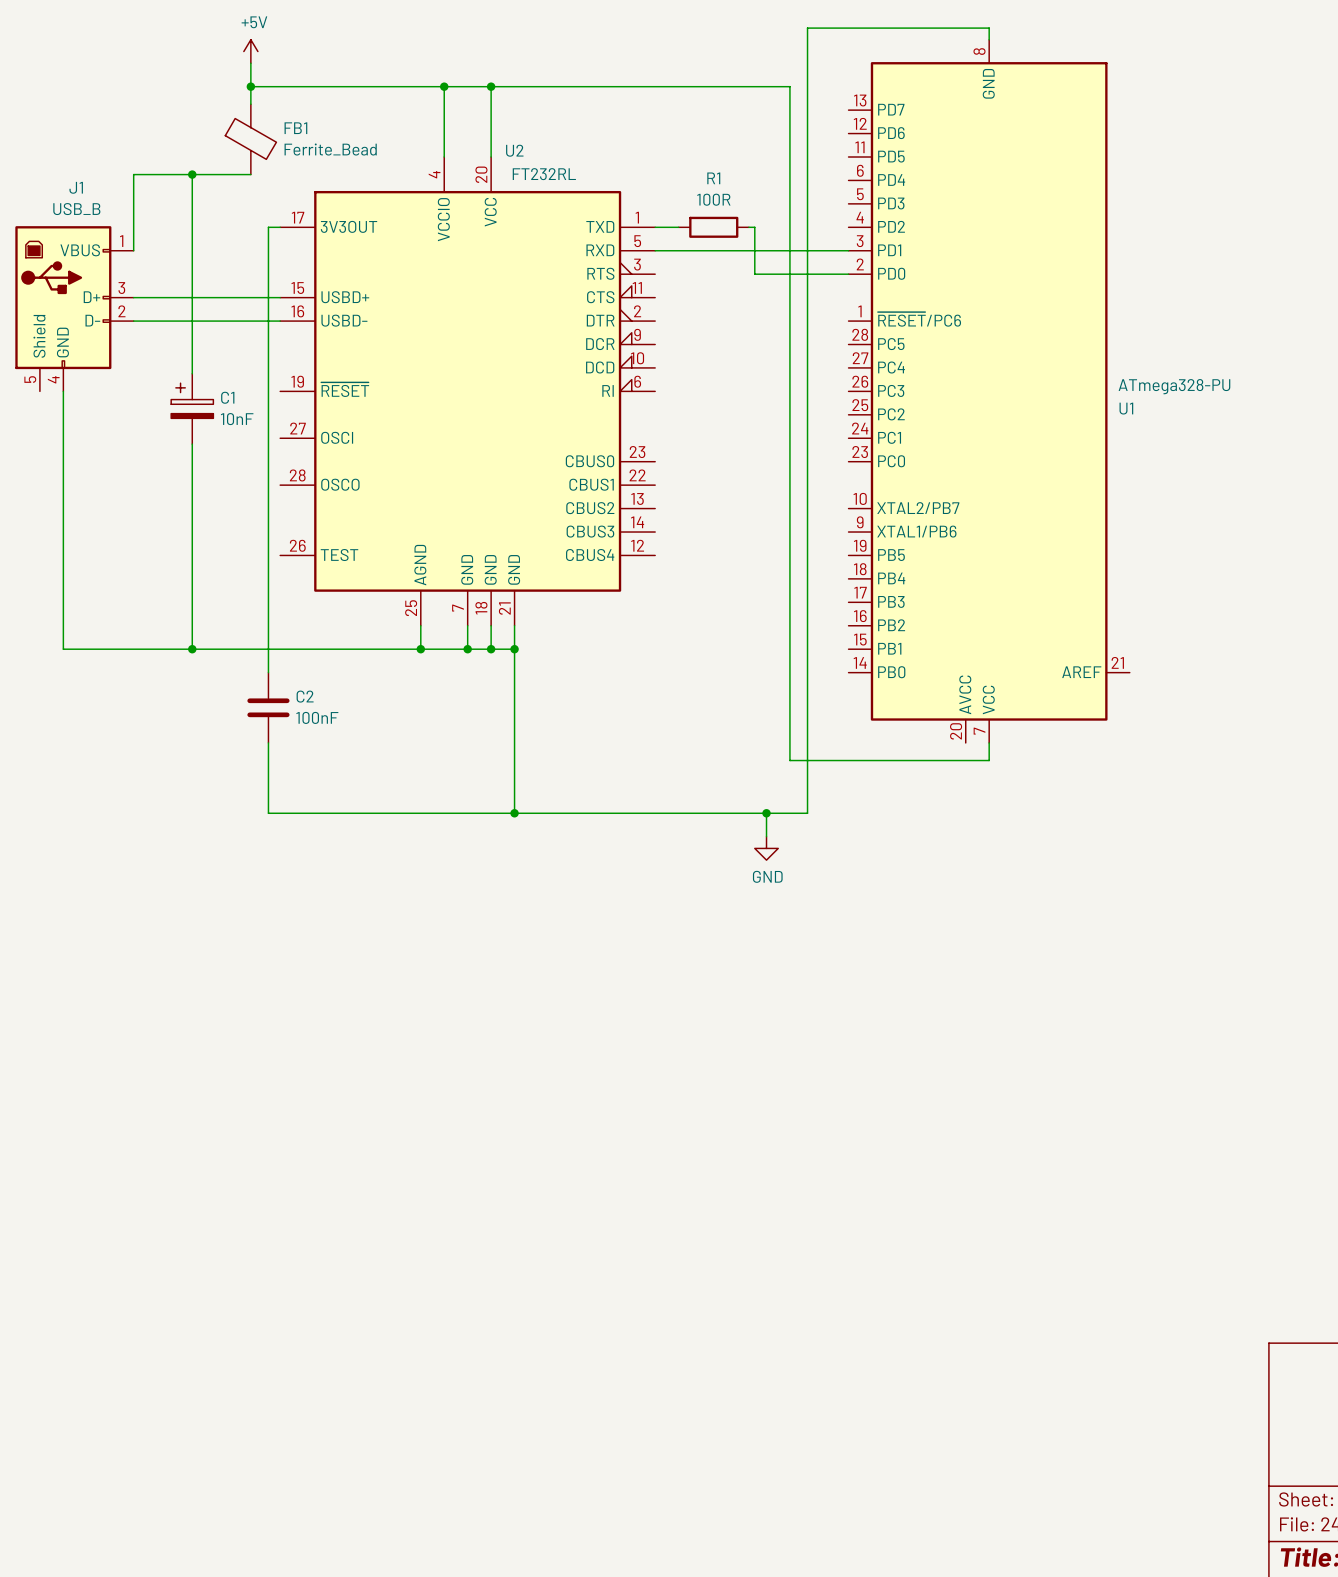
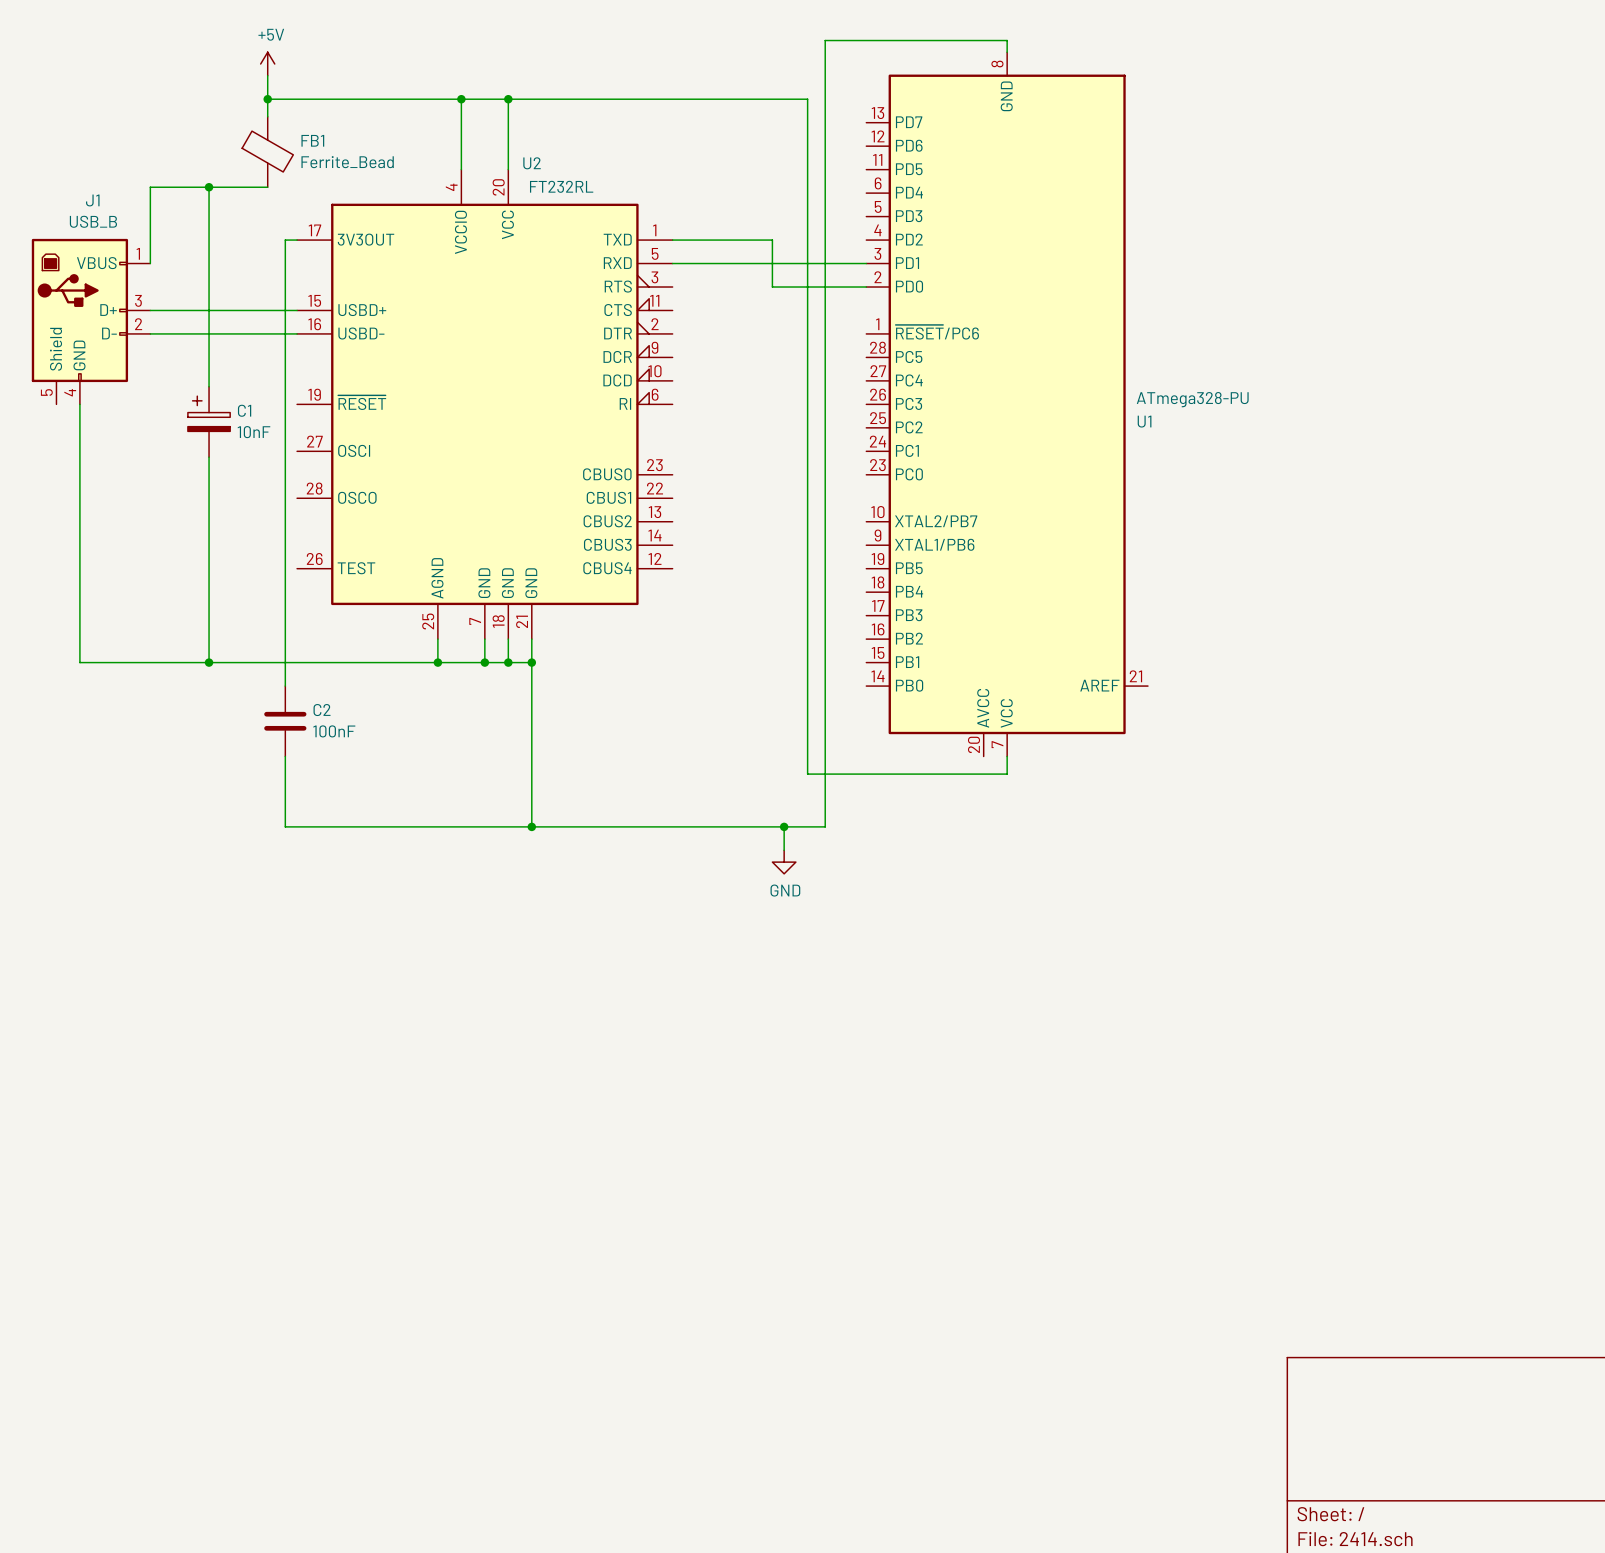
wire: none -> (696, 240) (766, 240)
R1: 100R (713, 227) -> none

